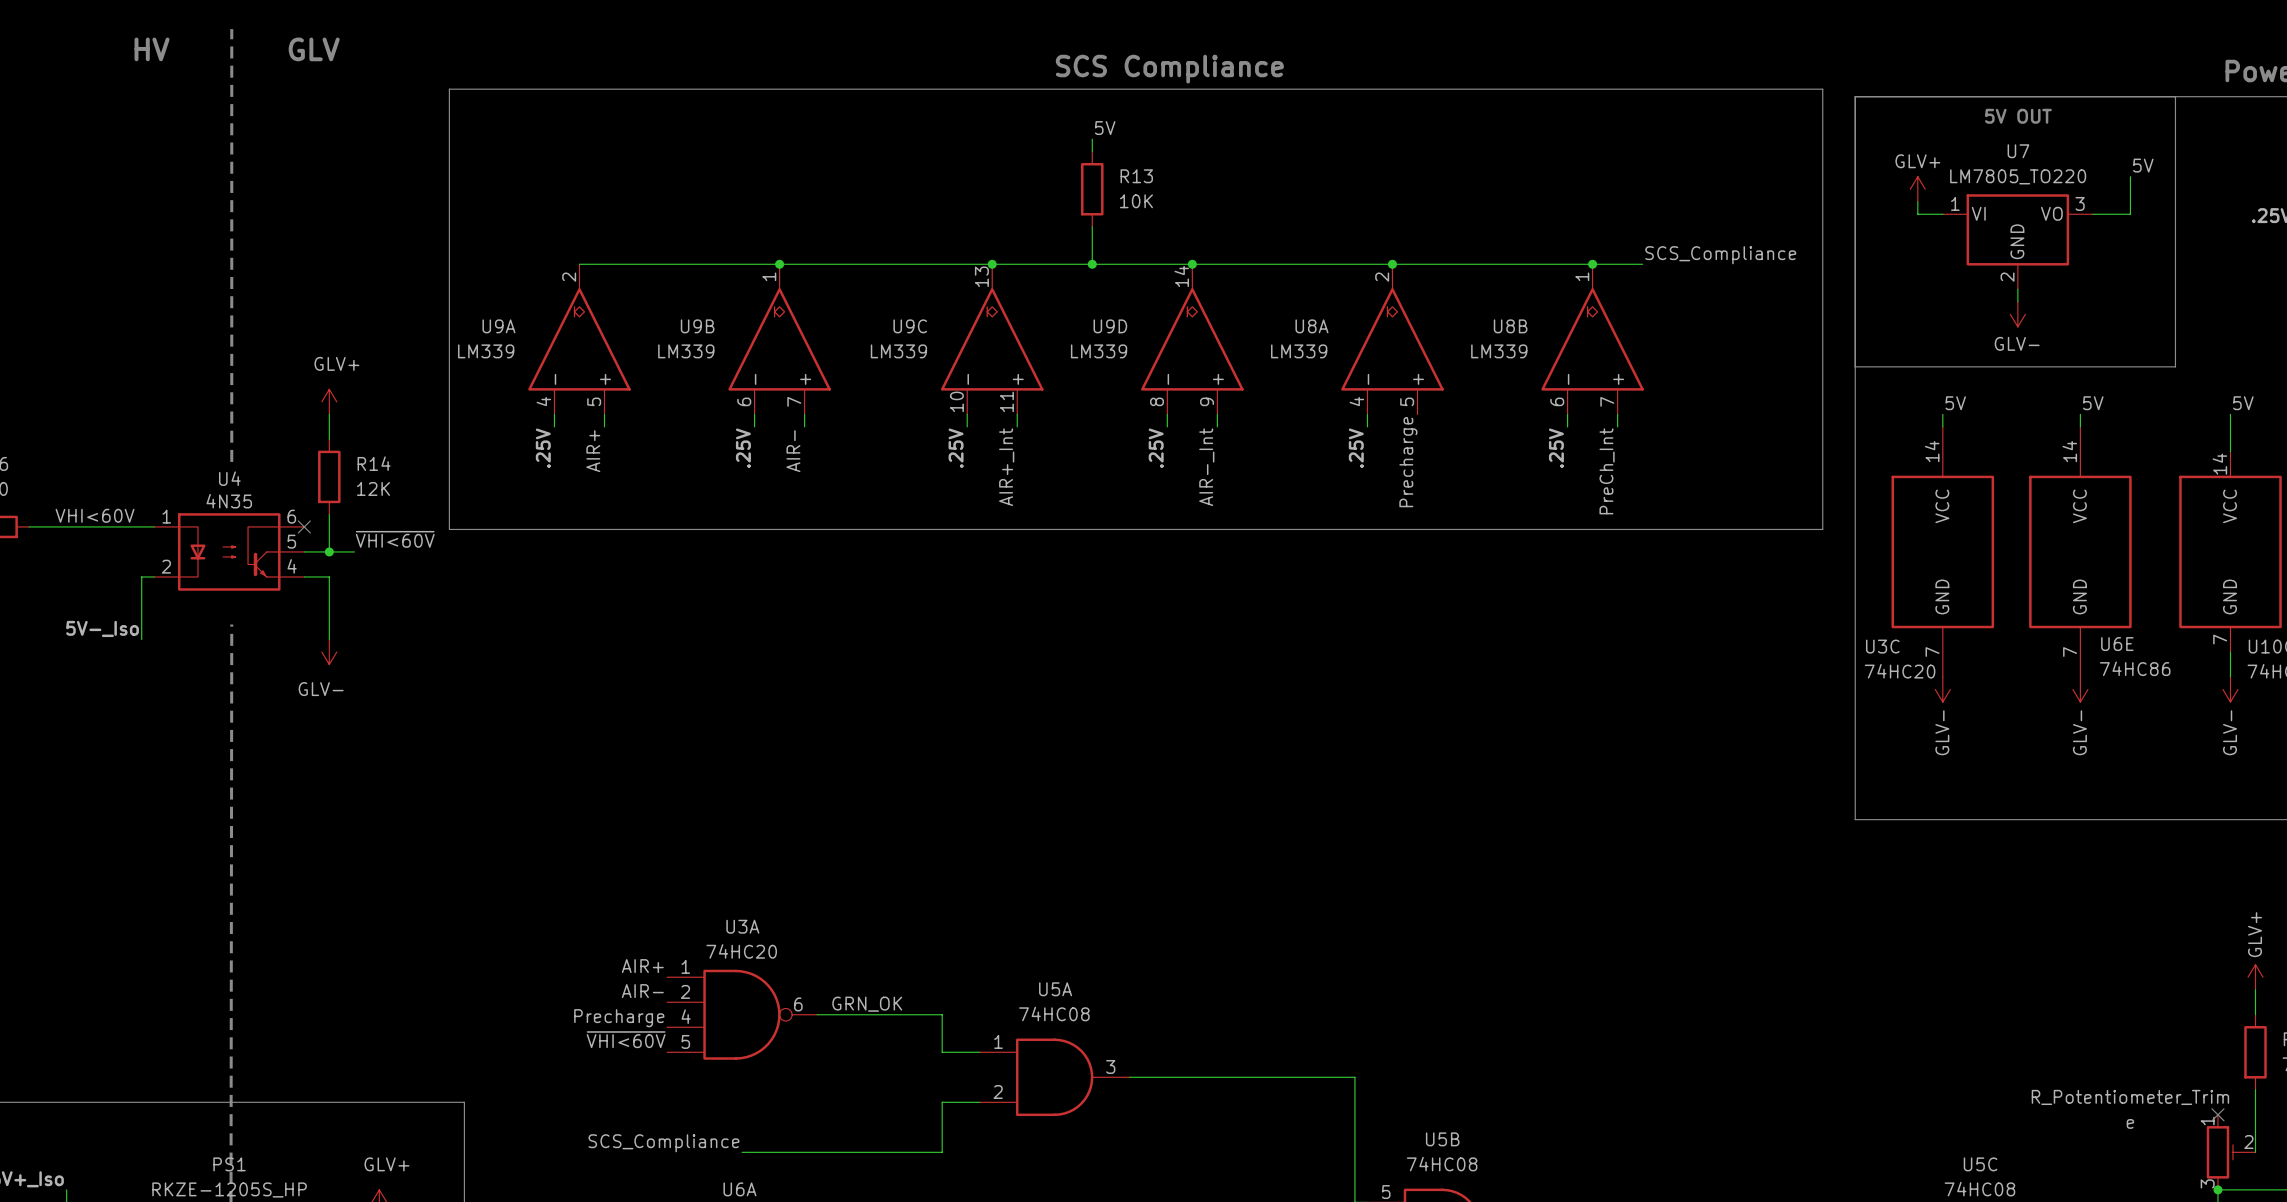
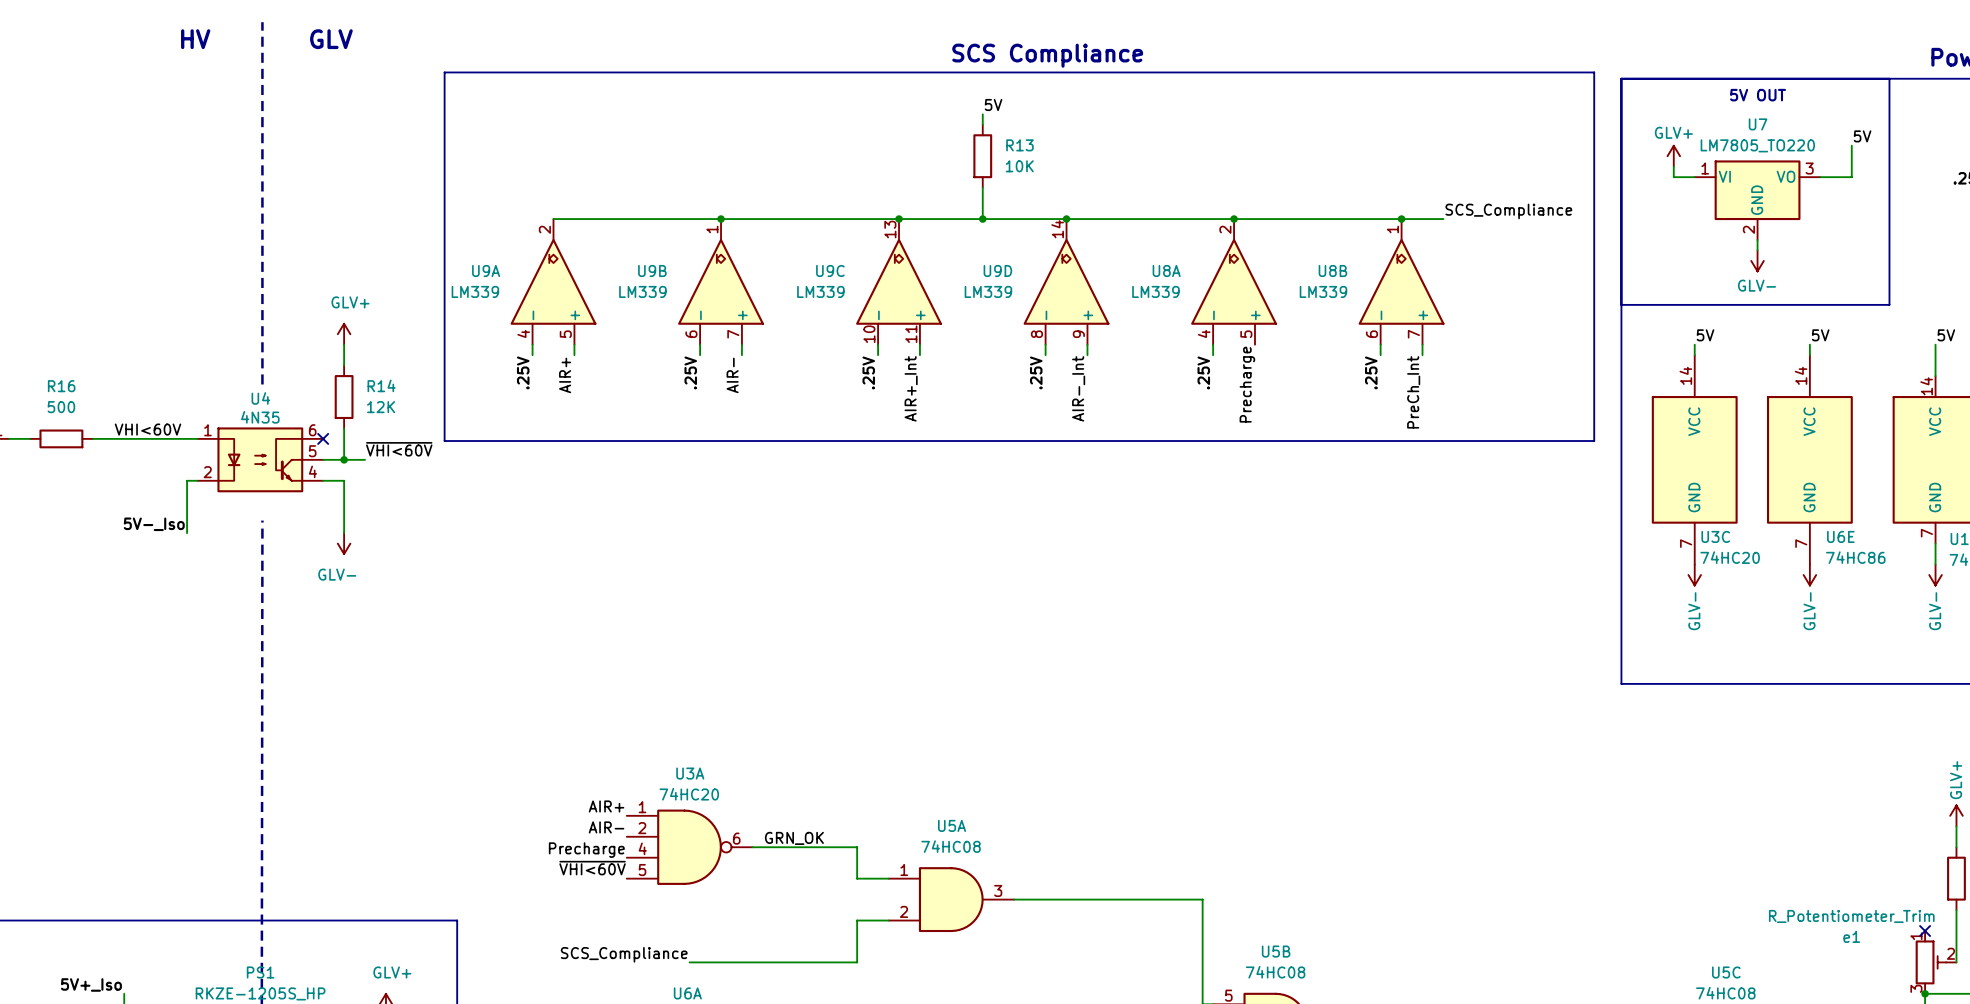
U3C name position: U3C (1882, 646) -> U3C (1715, 536)
U3C value position: 74HC20 (1900, 671) -> 74HC20 (1730, 557)
e name: e (2130, 1123) -> e1 (1851, 936)

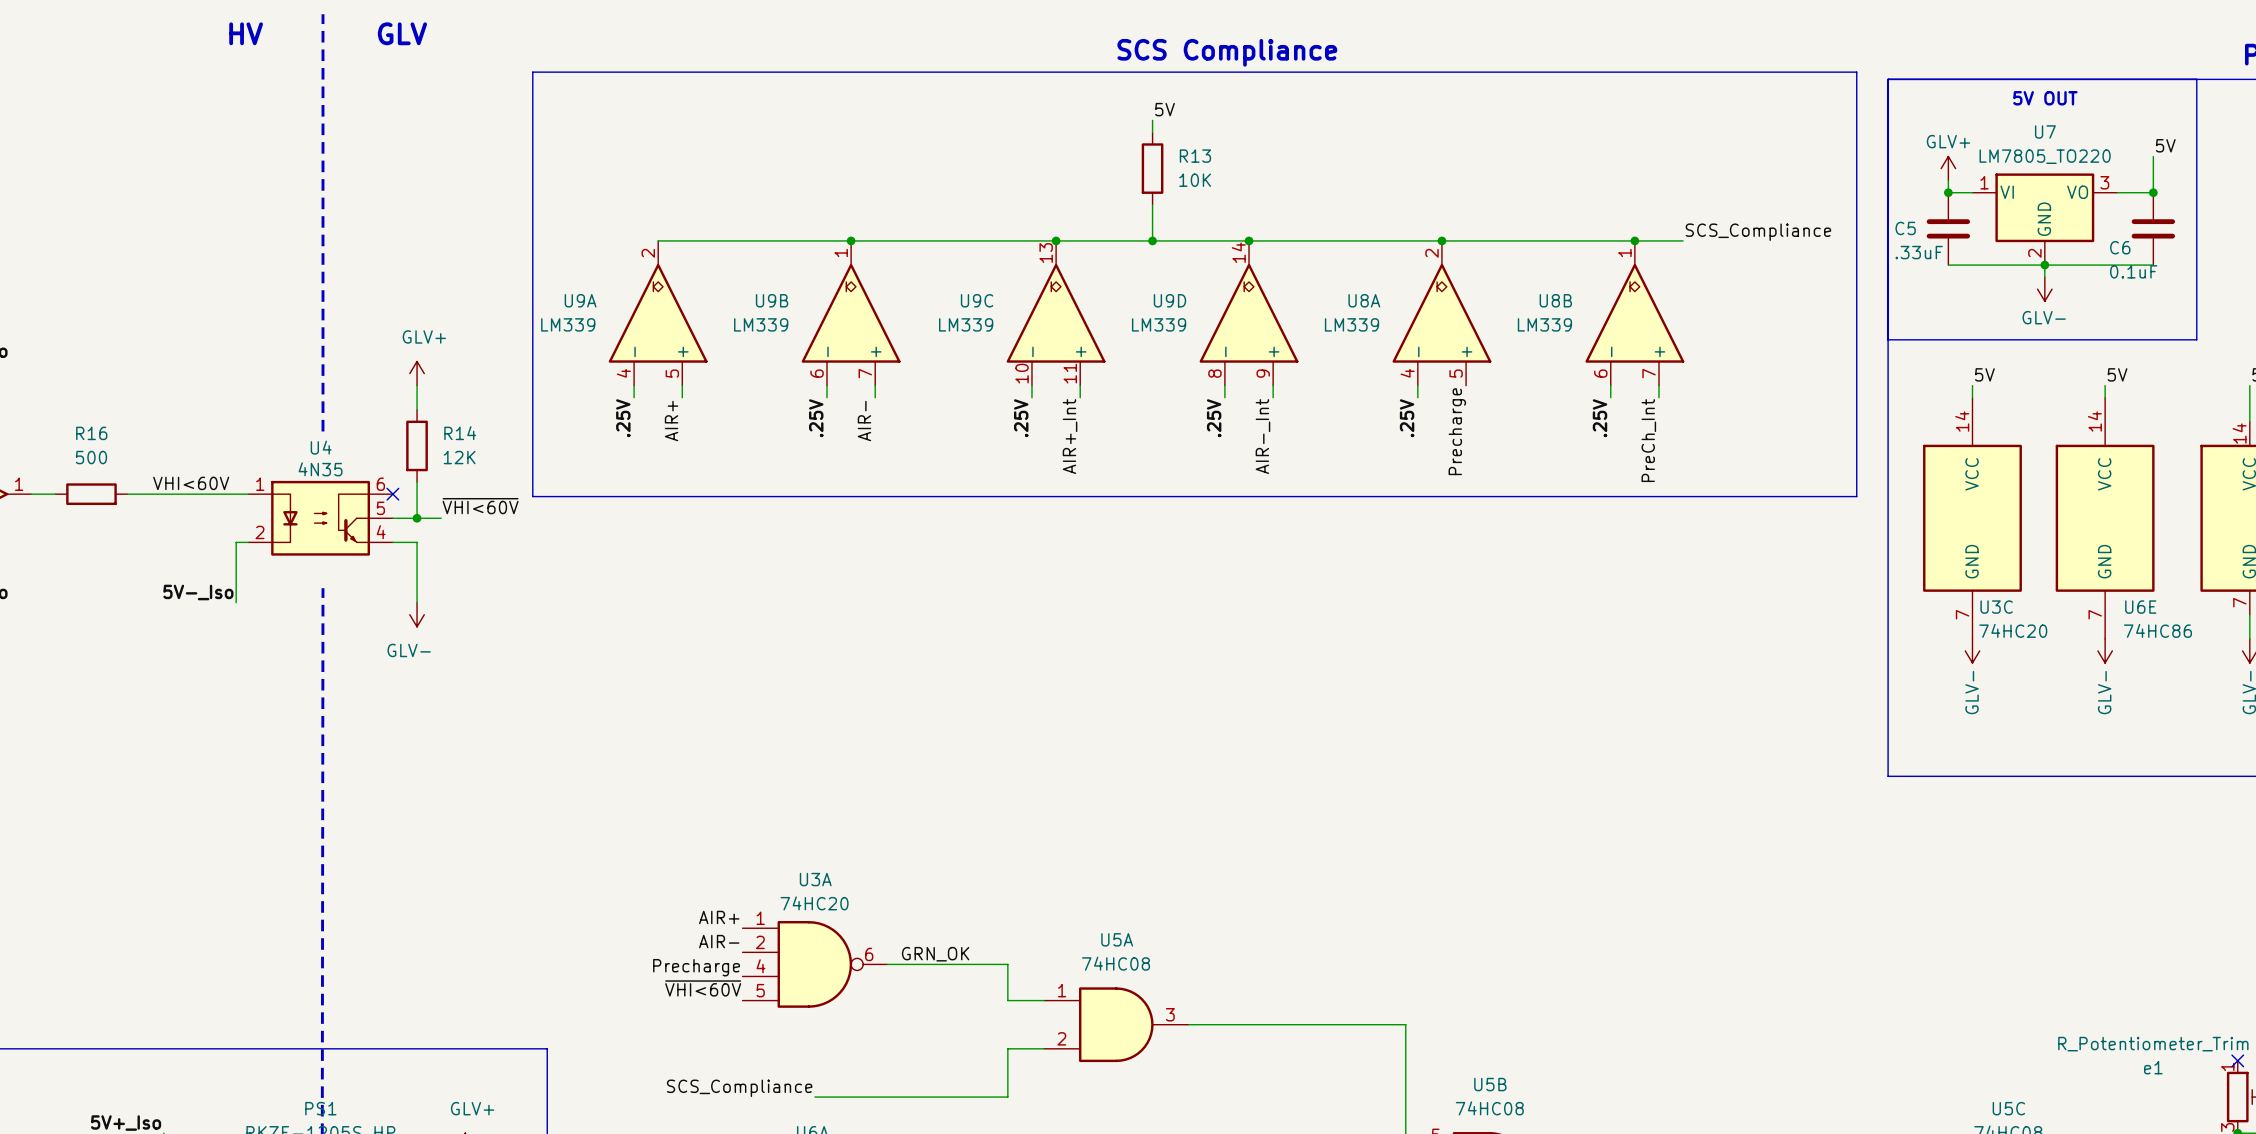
junction: none -> (1948, 192)
junction: none -> (2153, 192)
C5: none -> .33uF (1948, 228)
C6: none -> 0.1uF (2153, 228)
wire: none -> (1948, 265) (2153, 265)
junction: none -> (2044, 265)

